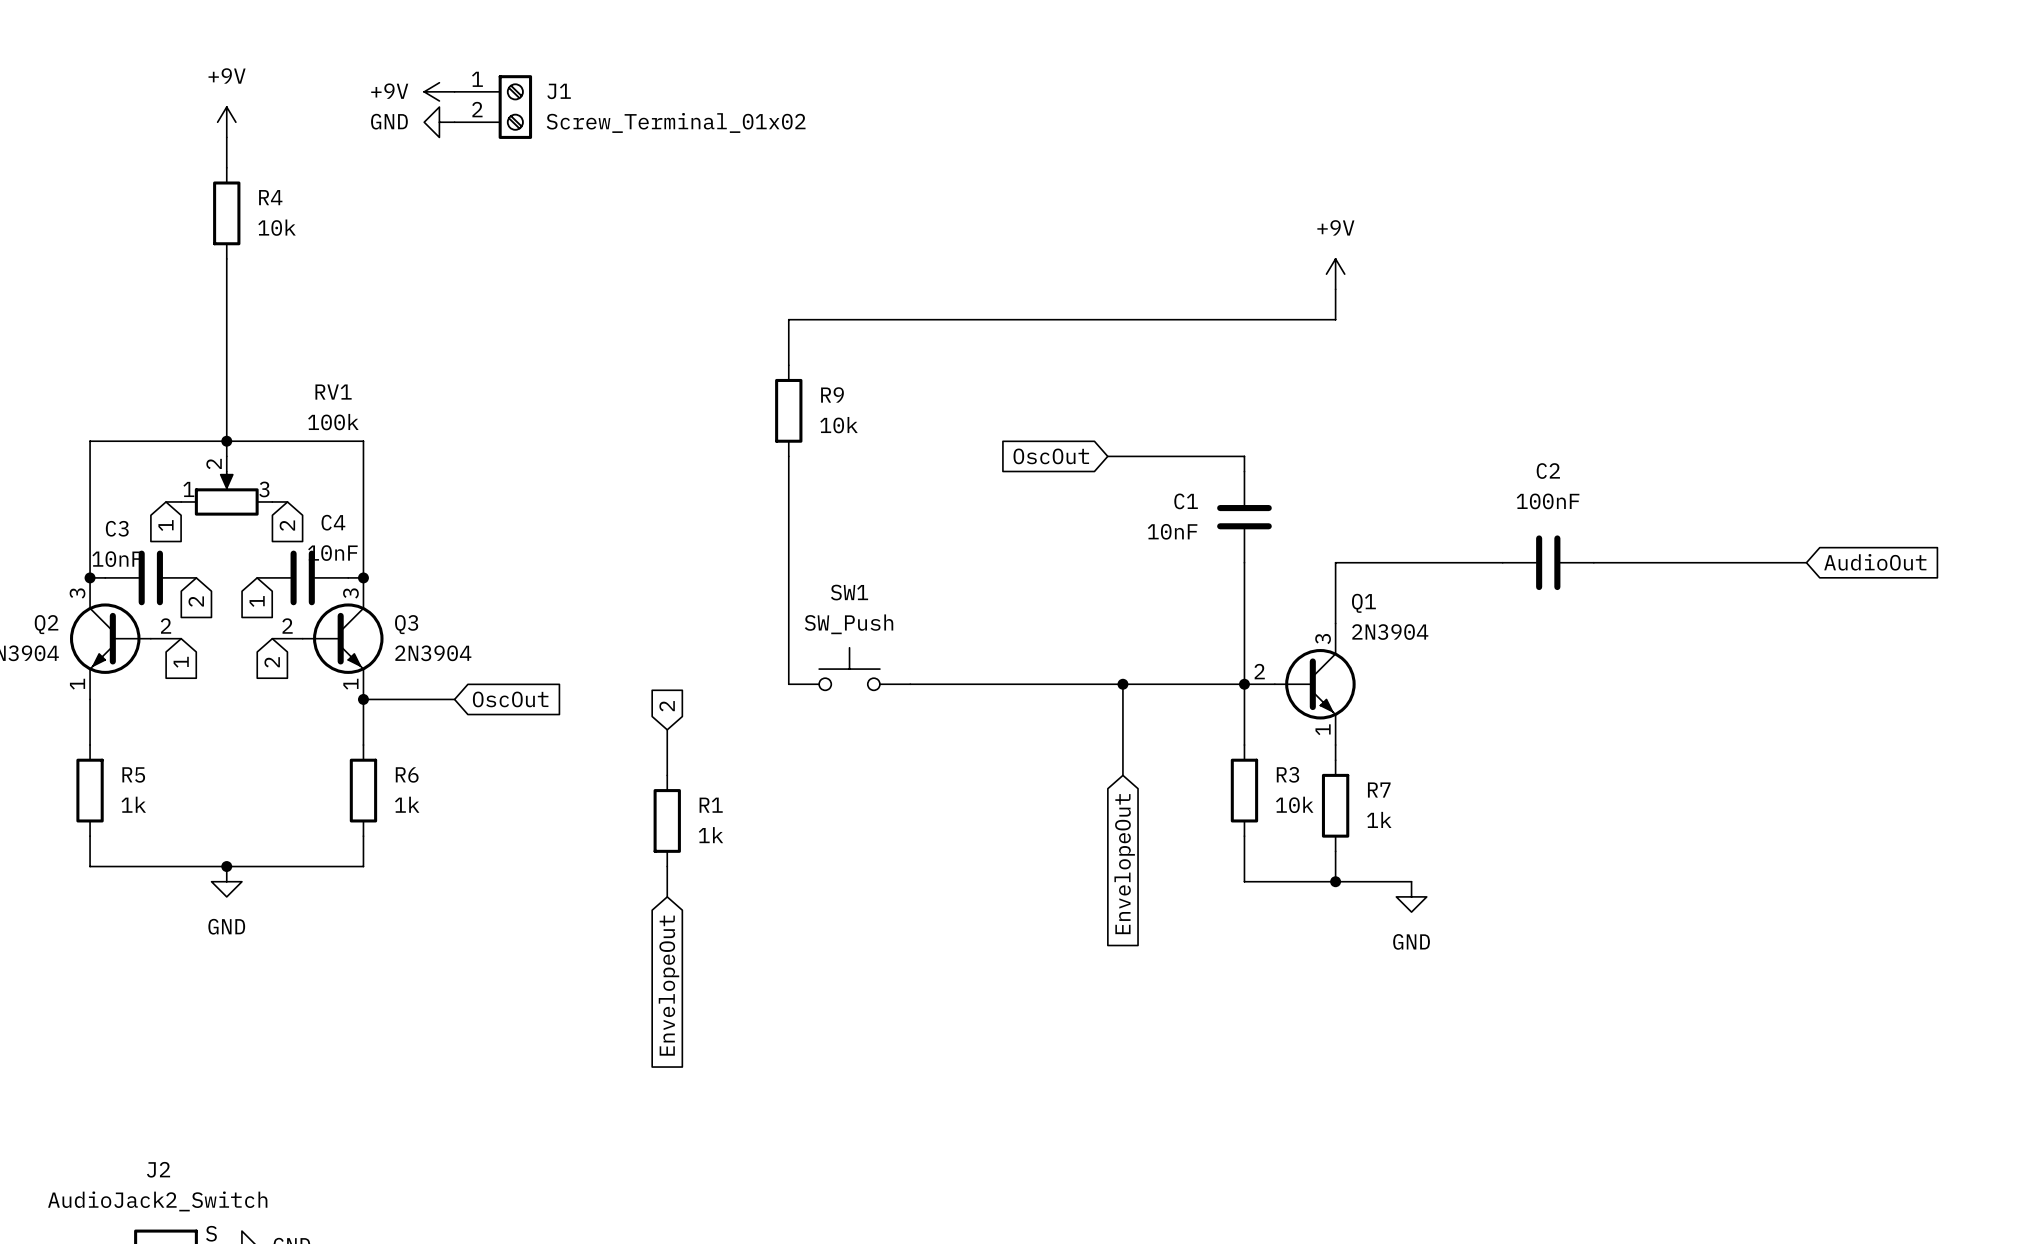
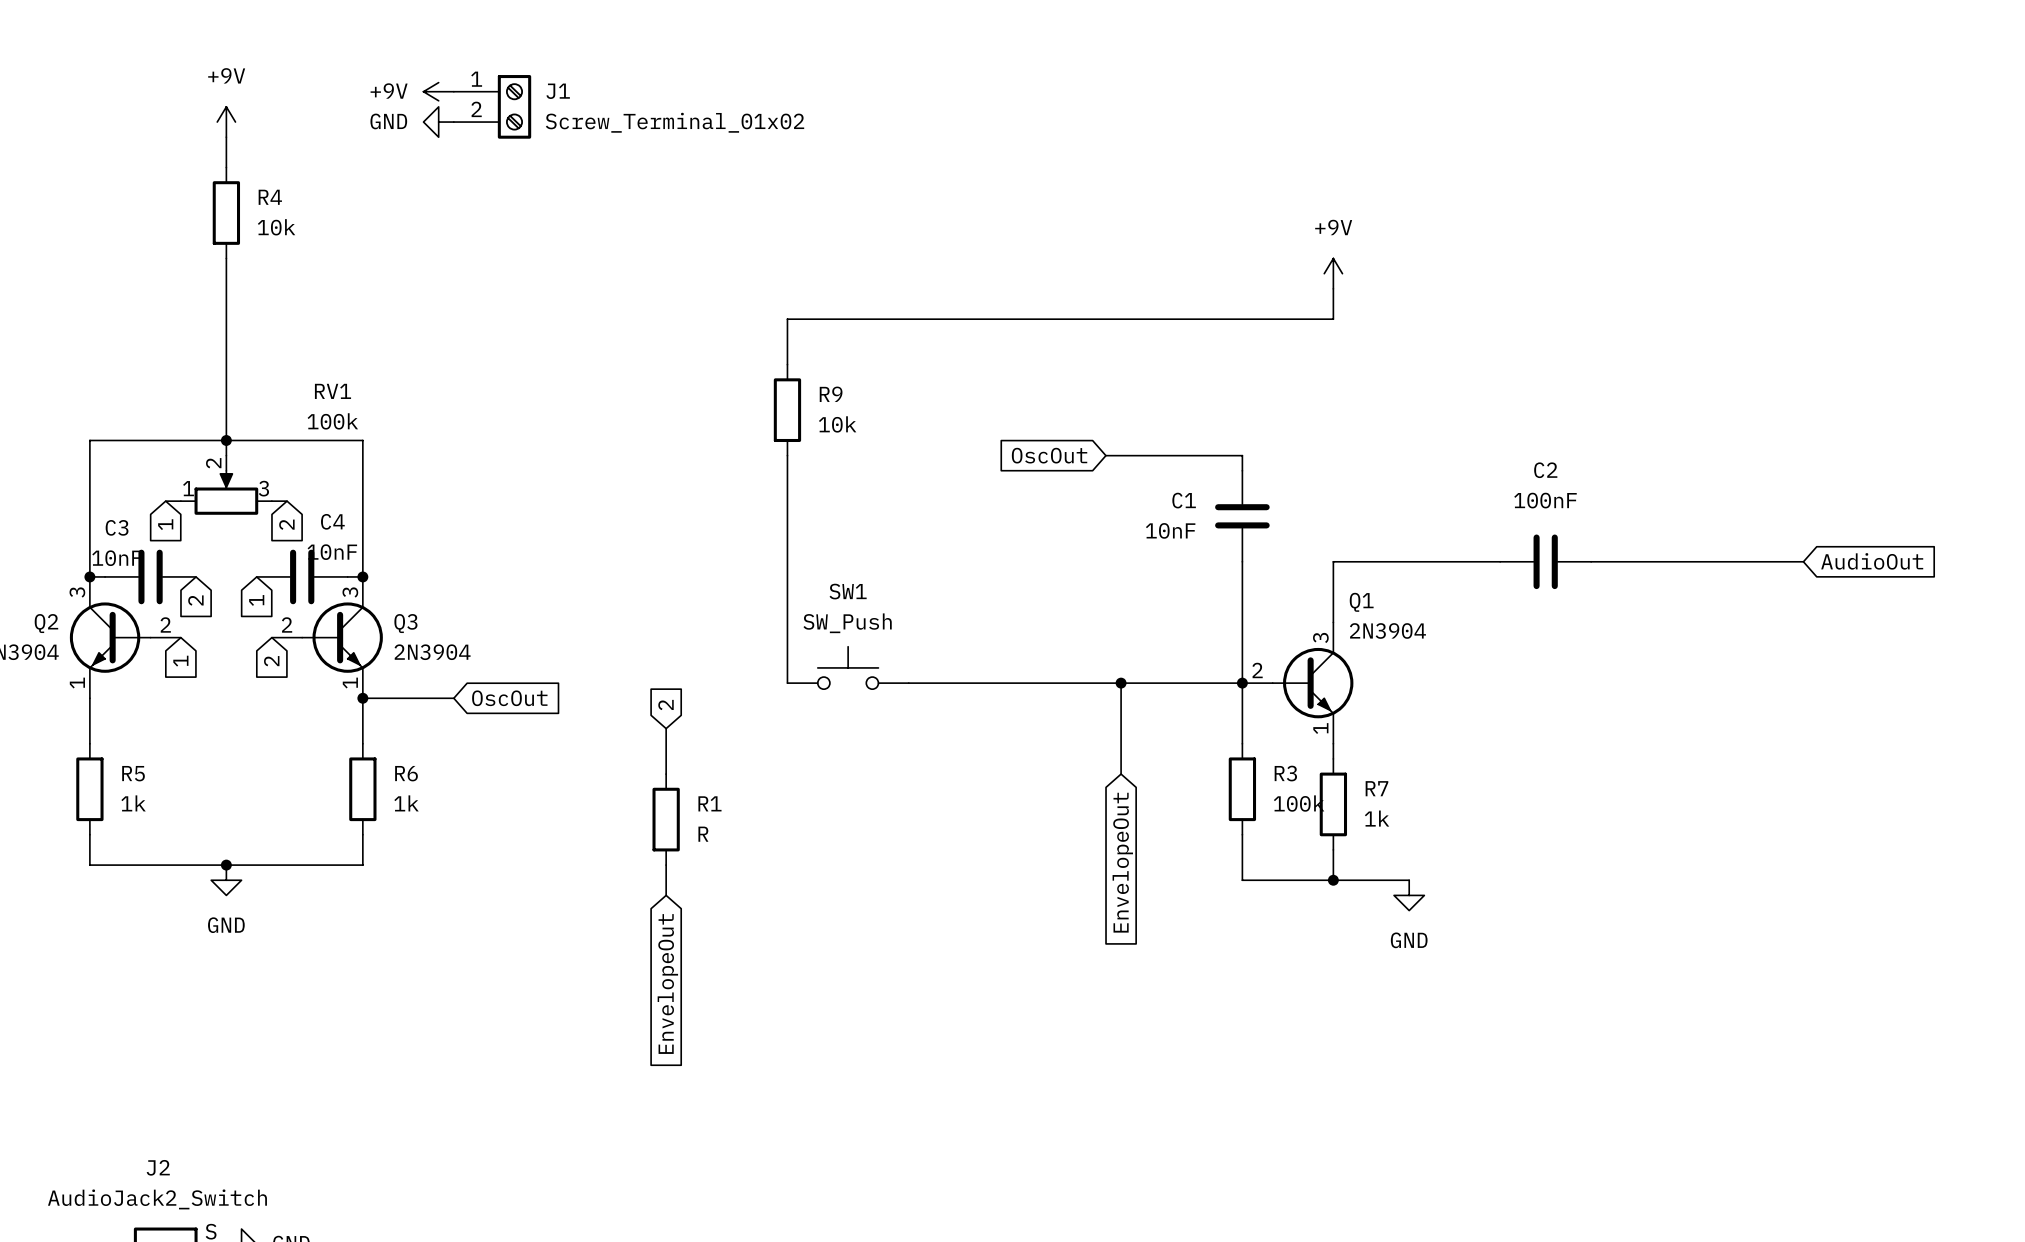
R3 value: 10k (1294, 804) -> 100k (1299, 803)
R1 value: 1k (710, 835) -> R (703, 834)

